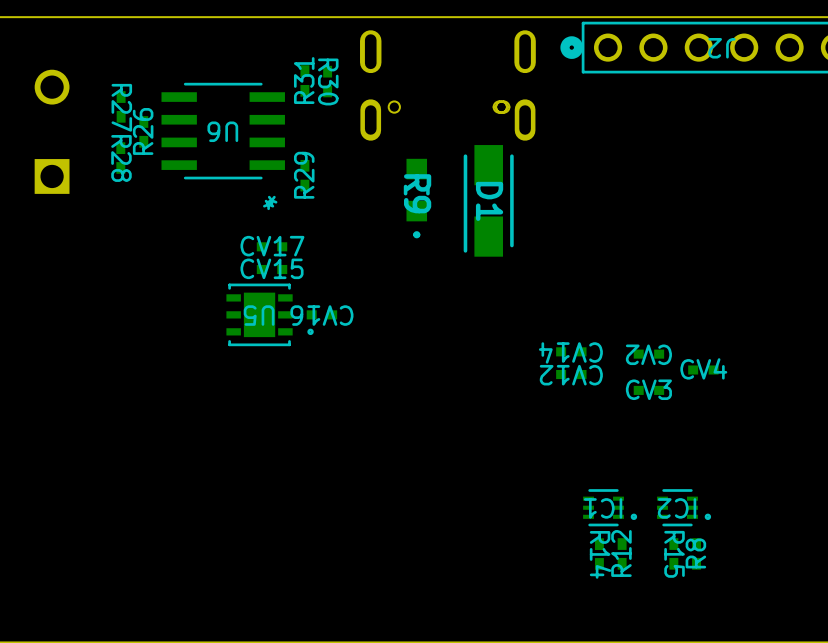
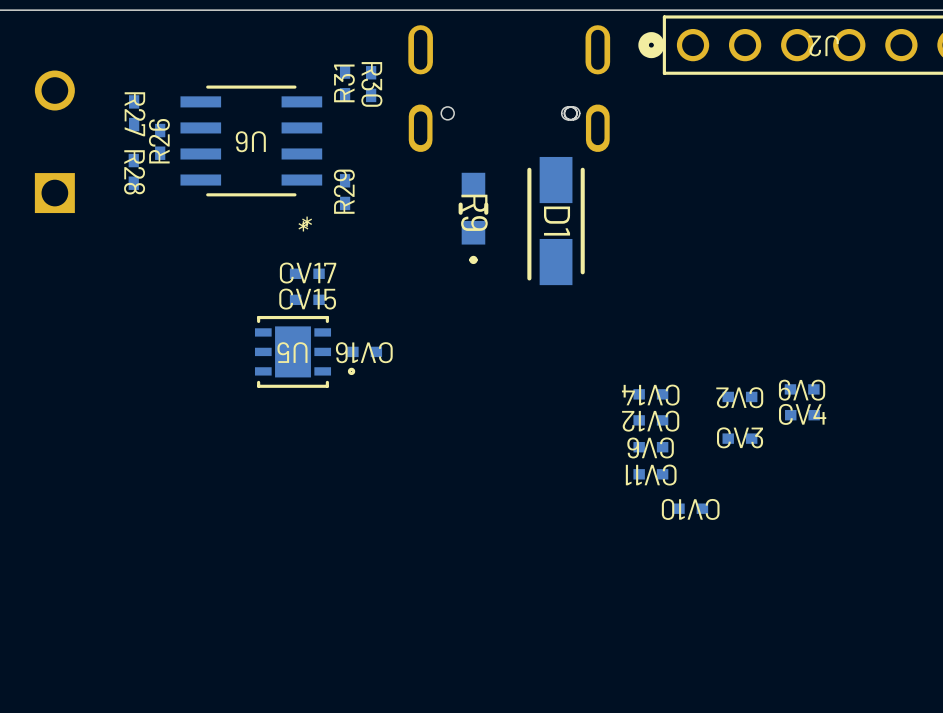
CV9: none -> (802, 389)
CV6: none -> (650, 447)
CV11: none -> (650, 474)
CV10: none -> (690, 508)
IC1: (610, 507) -> none
IC2: (684, 507) -> none
R12: (622, 553) -> none
R15: (673, 553) -> none
R8: (696, 553) -> none
R14: (599, 554) -> none

